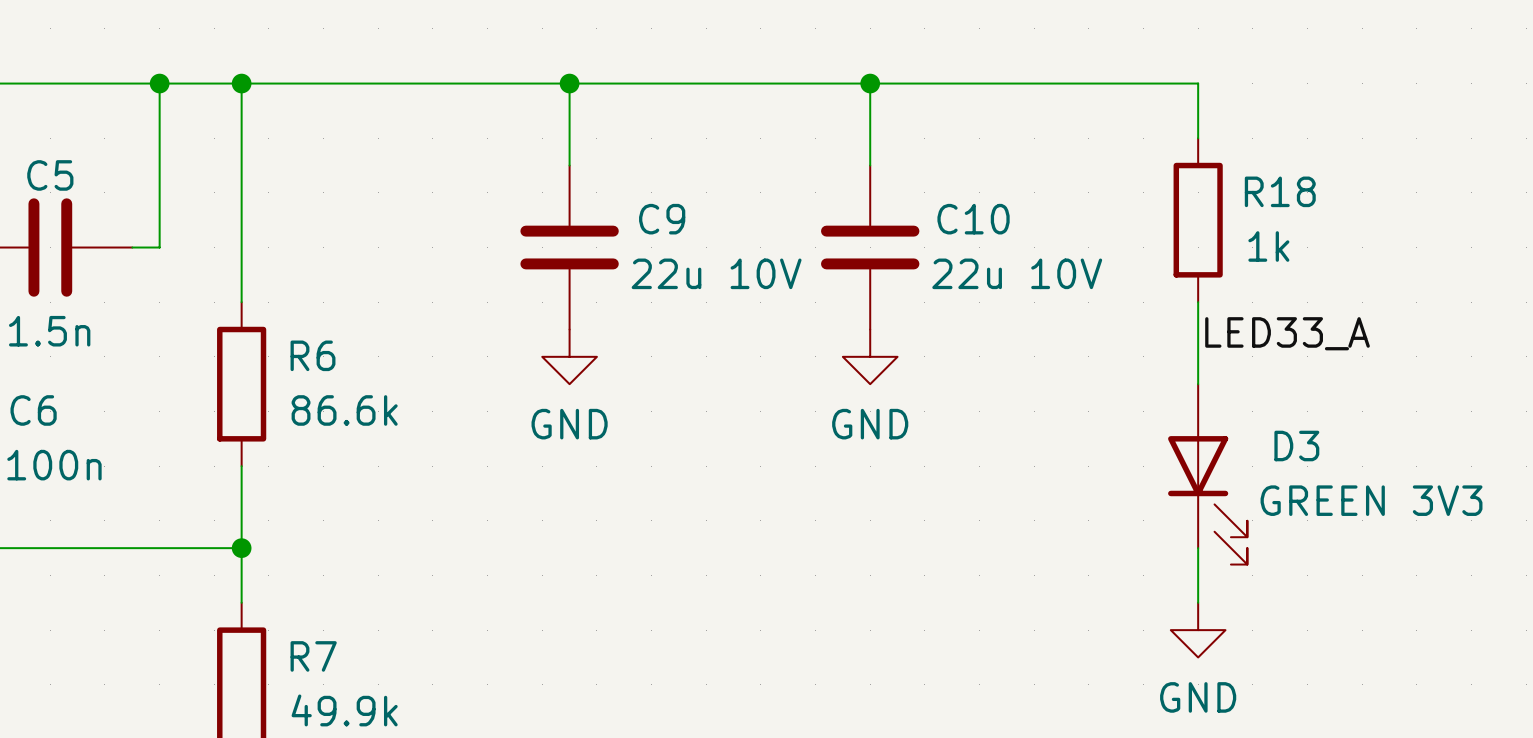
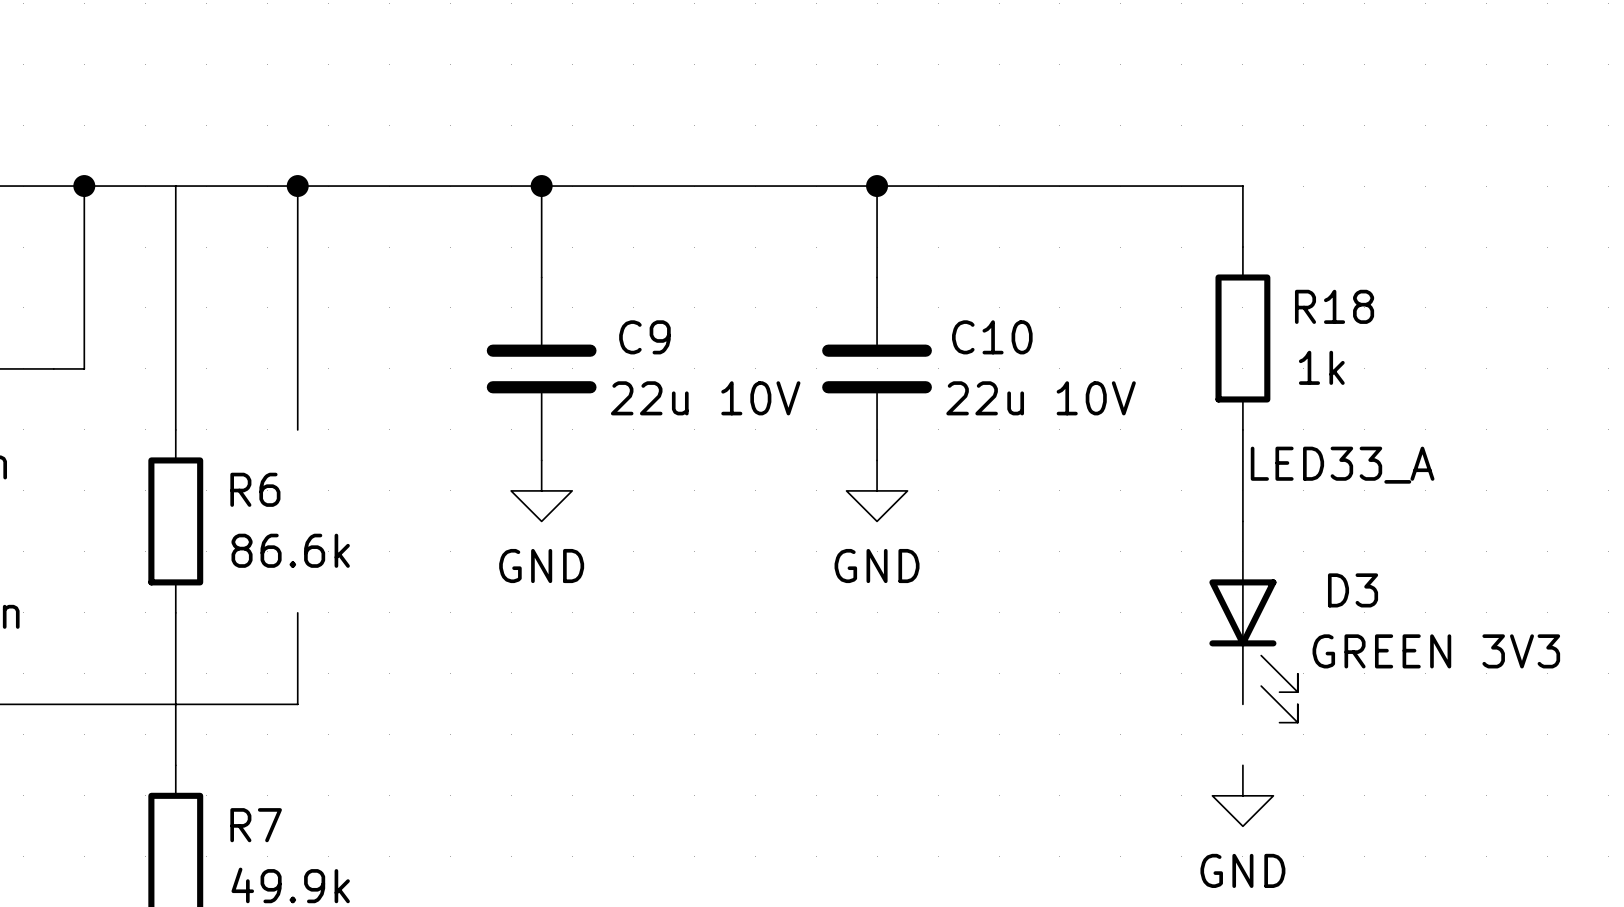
junction position: (241, 83) -> (297, 186)
wire: none -> (297, 186) (297, 429)
wire: none -> (297, 612) (297, 704) (175, 704)
junction: (241, 548) -> none
wire: (1198, 548) (1198, 602) -> none

